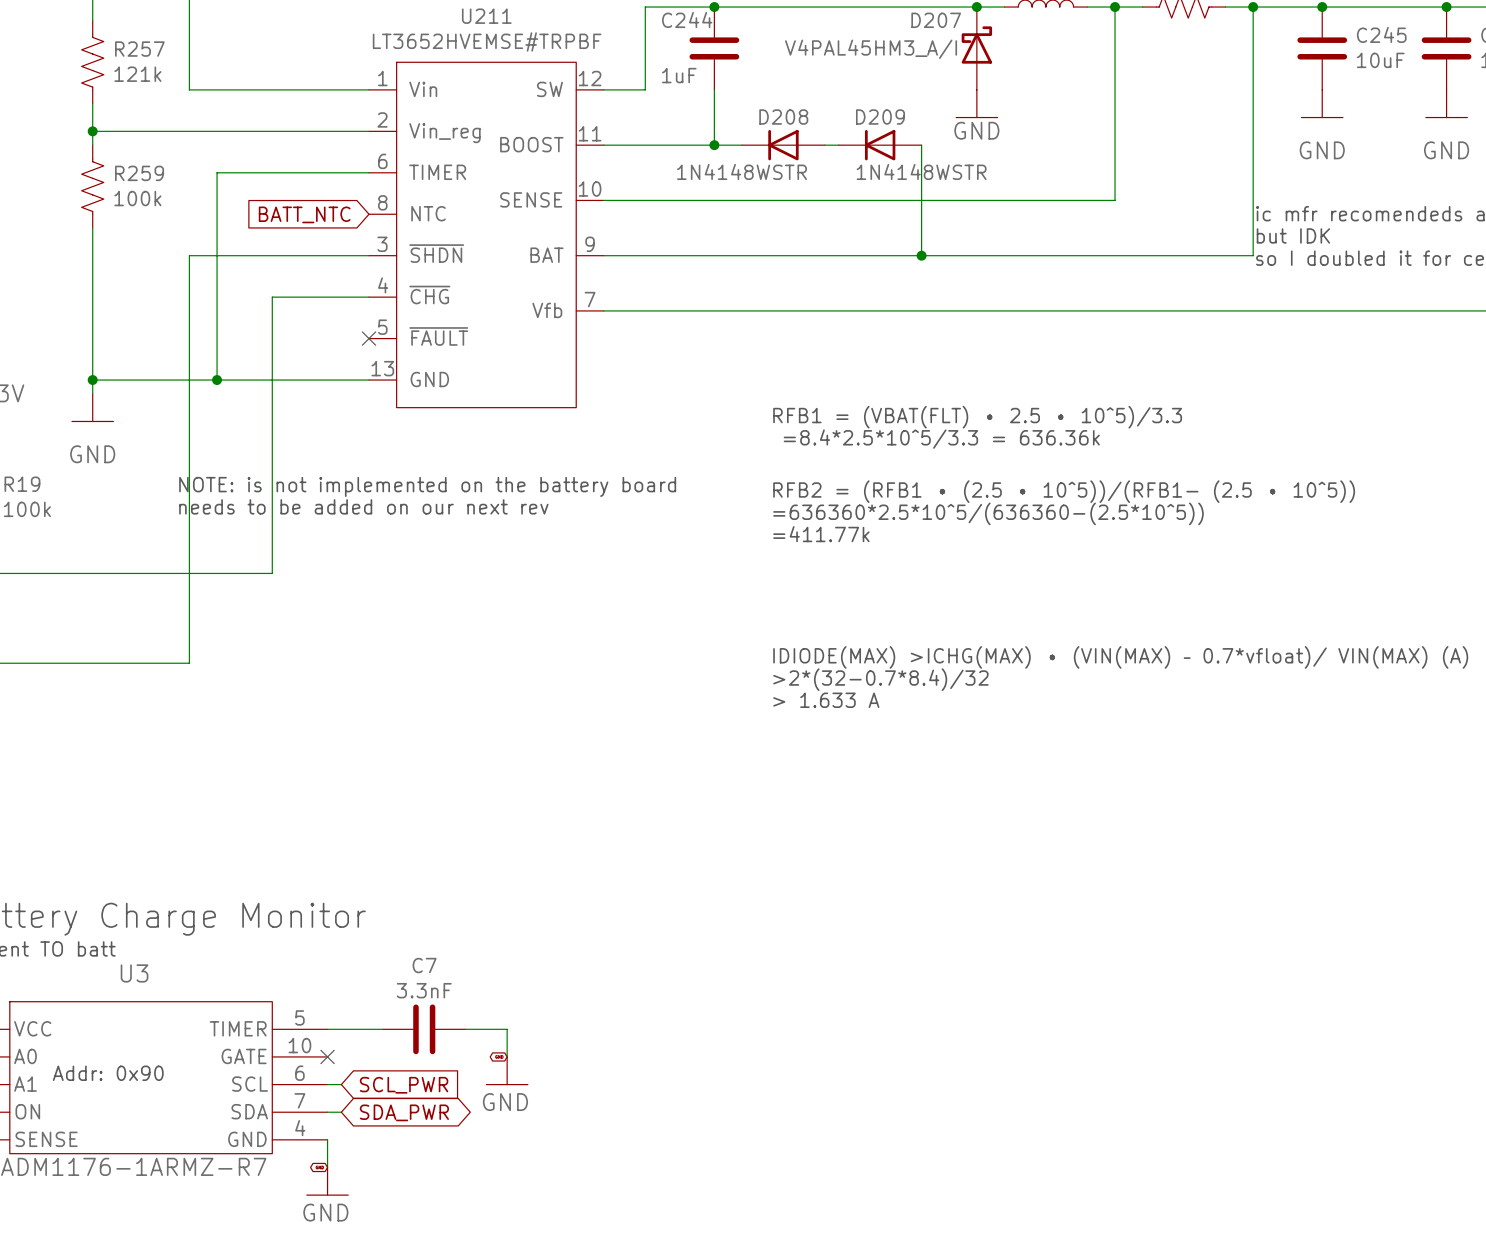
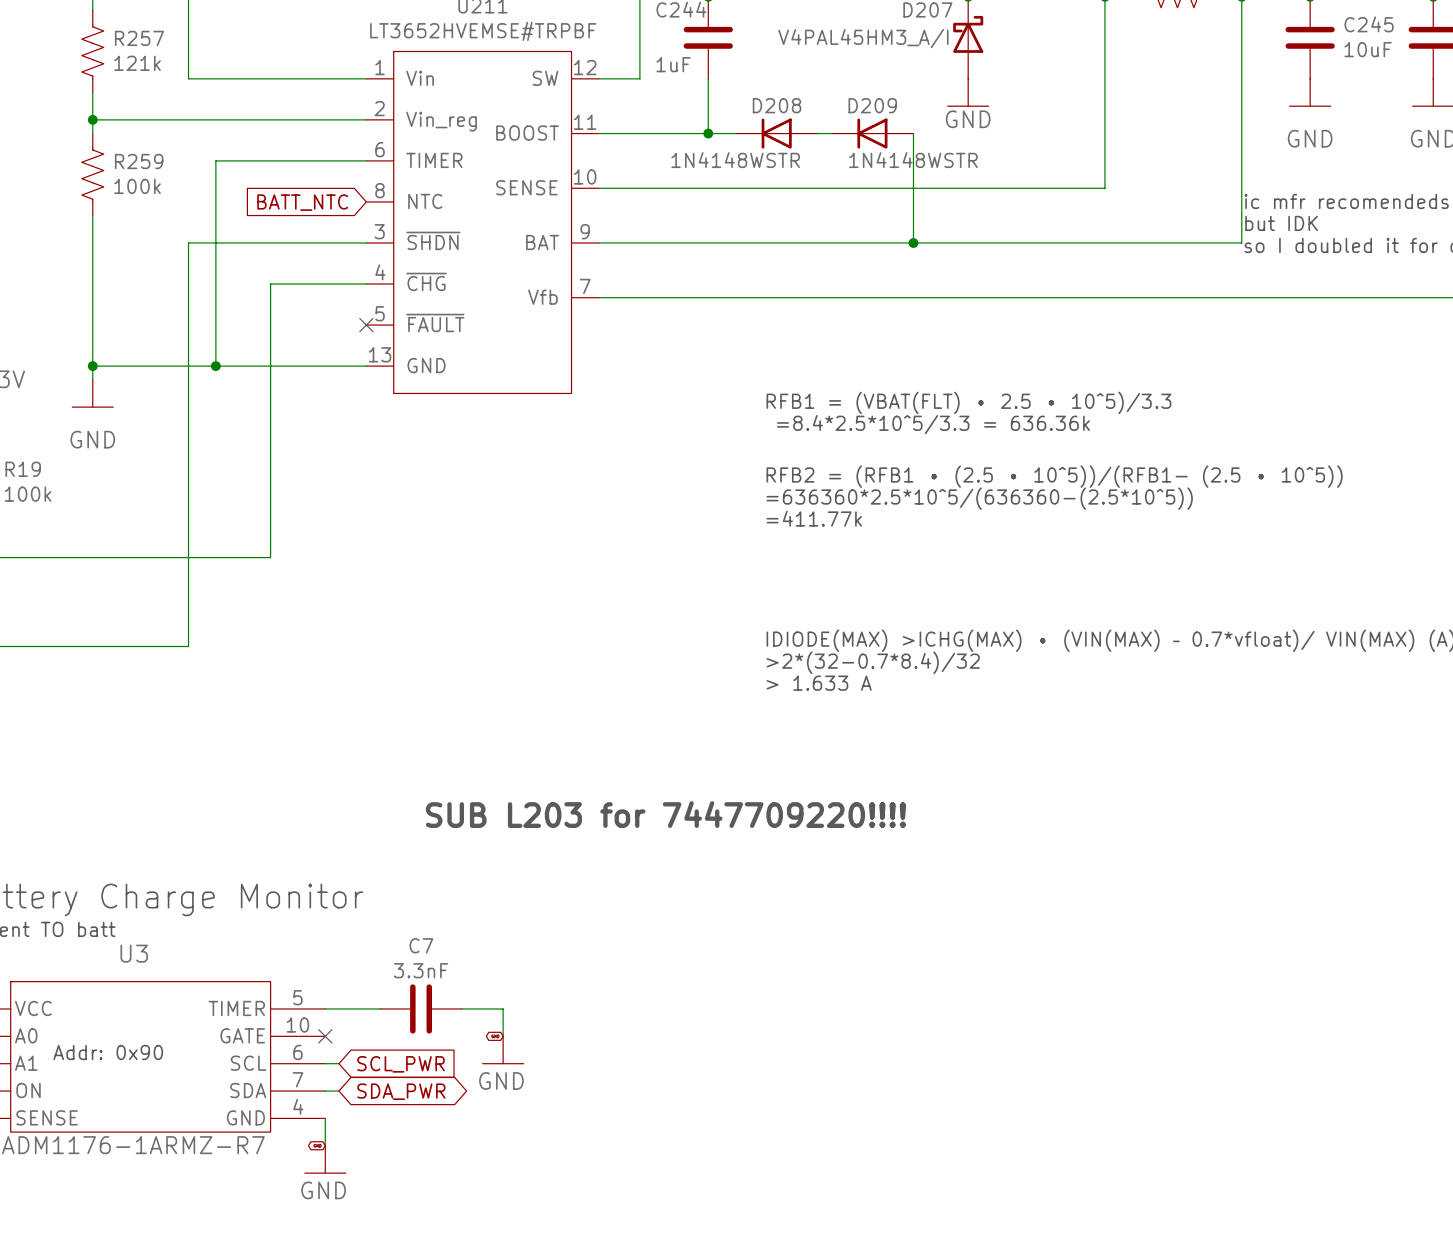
text: NOTE: is not implemented on the battery board (427, 486) -> none
text: needs to be added on our next rev (363, 506) -> none
text: none -> SUB L203 for 7447709220!!!! (665, 814)

